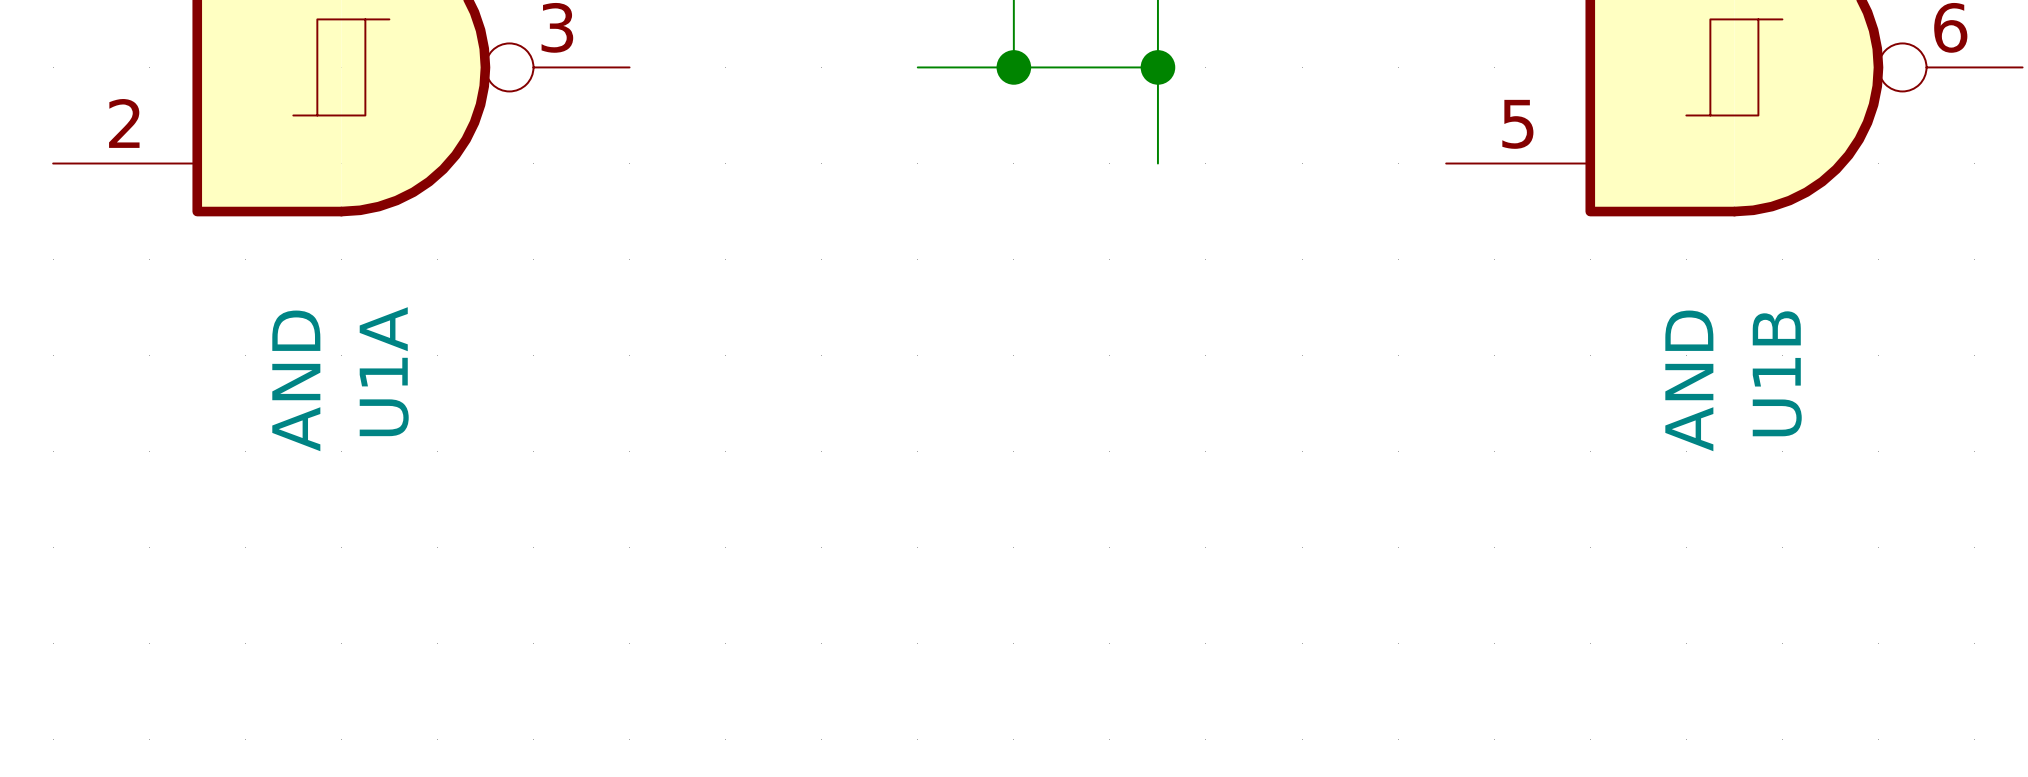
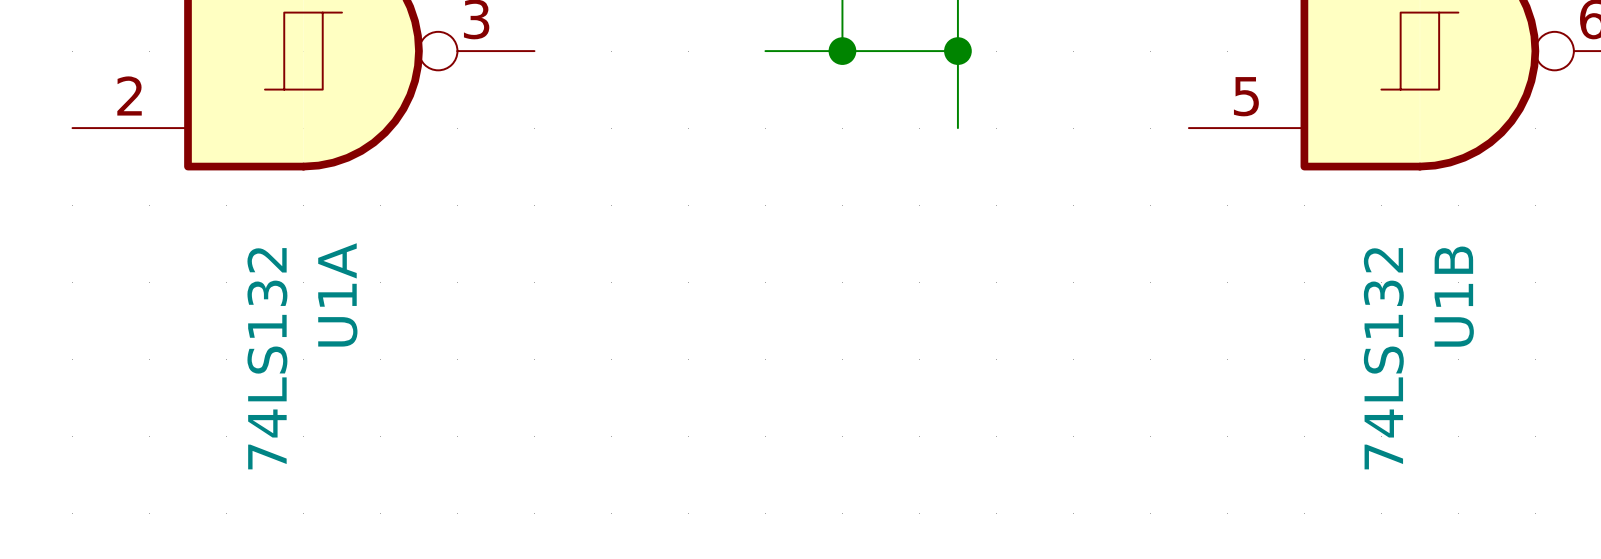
U1A value: AND (296, 380) -> 74LS132 (267, 358)
U1B value: AND (1689, 380) -> 74LS132 (1383, 358)

